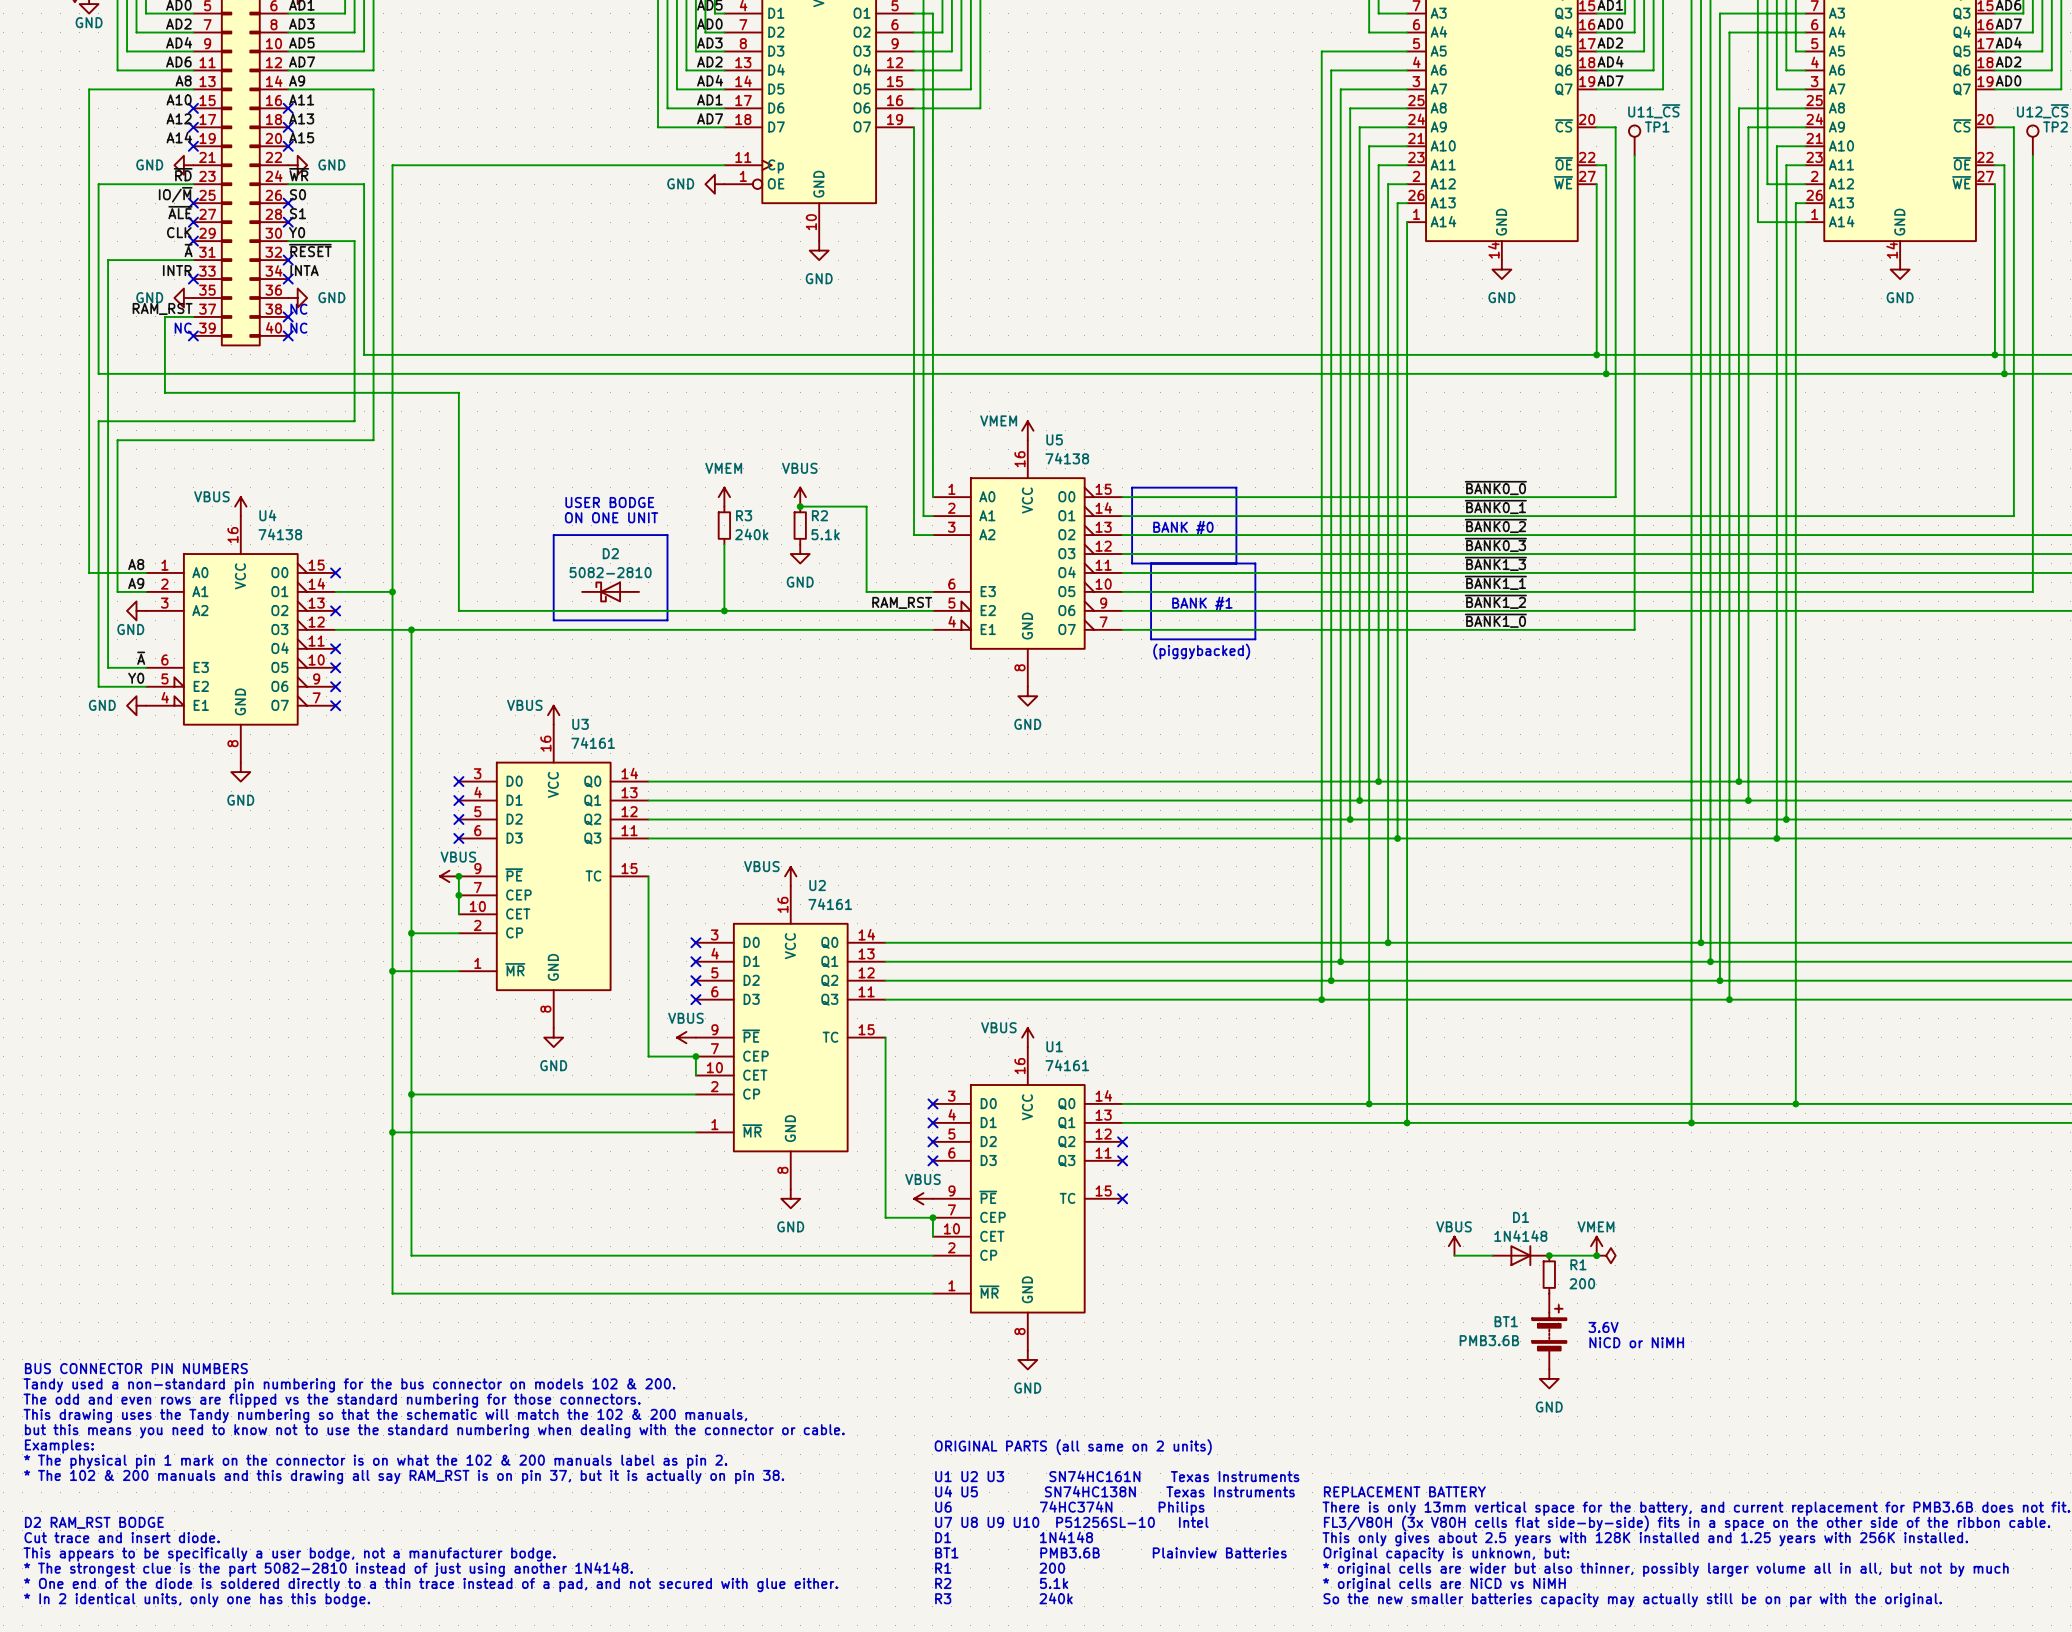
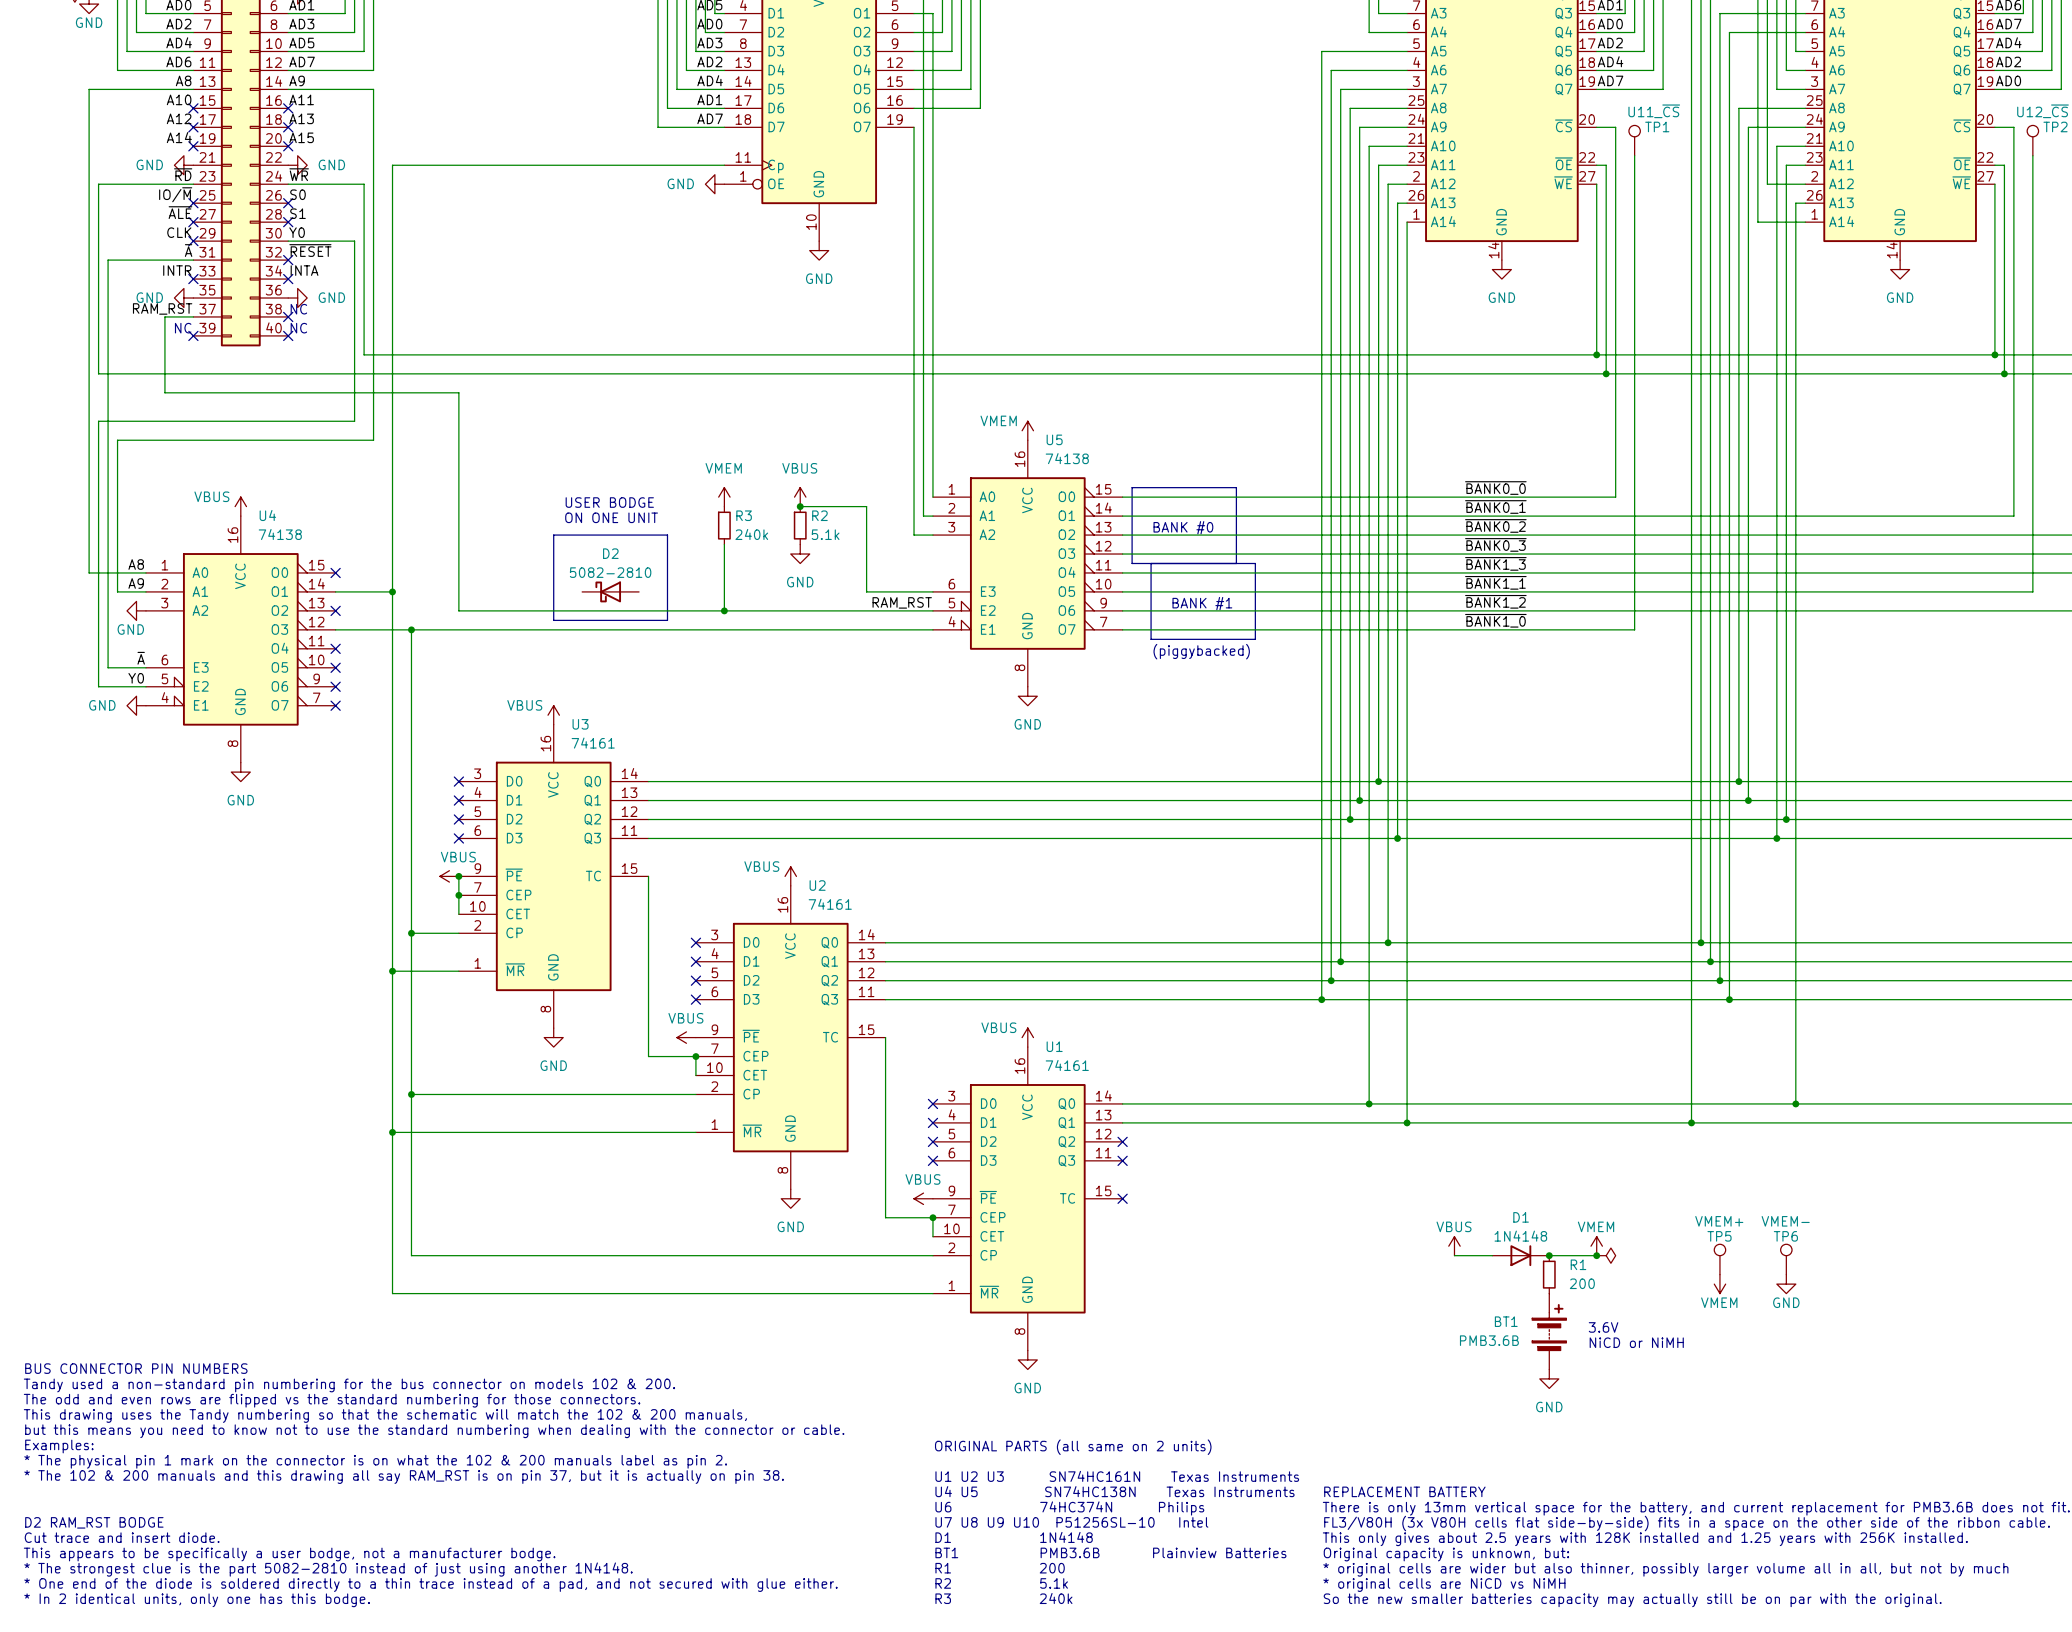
TP5: none -> VMEM+ (1719, 1259)
TP6: none -> VMEM- (1786, 1259)
power symbol: none -> VMEM (1719, 1284)
power symbol: none -> GND (1786, 1284)

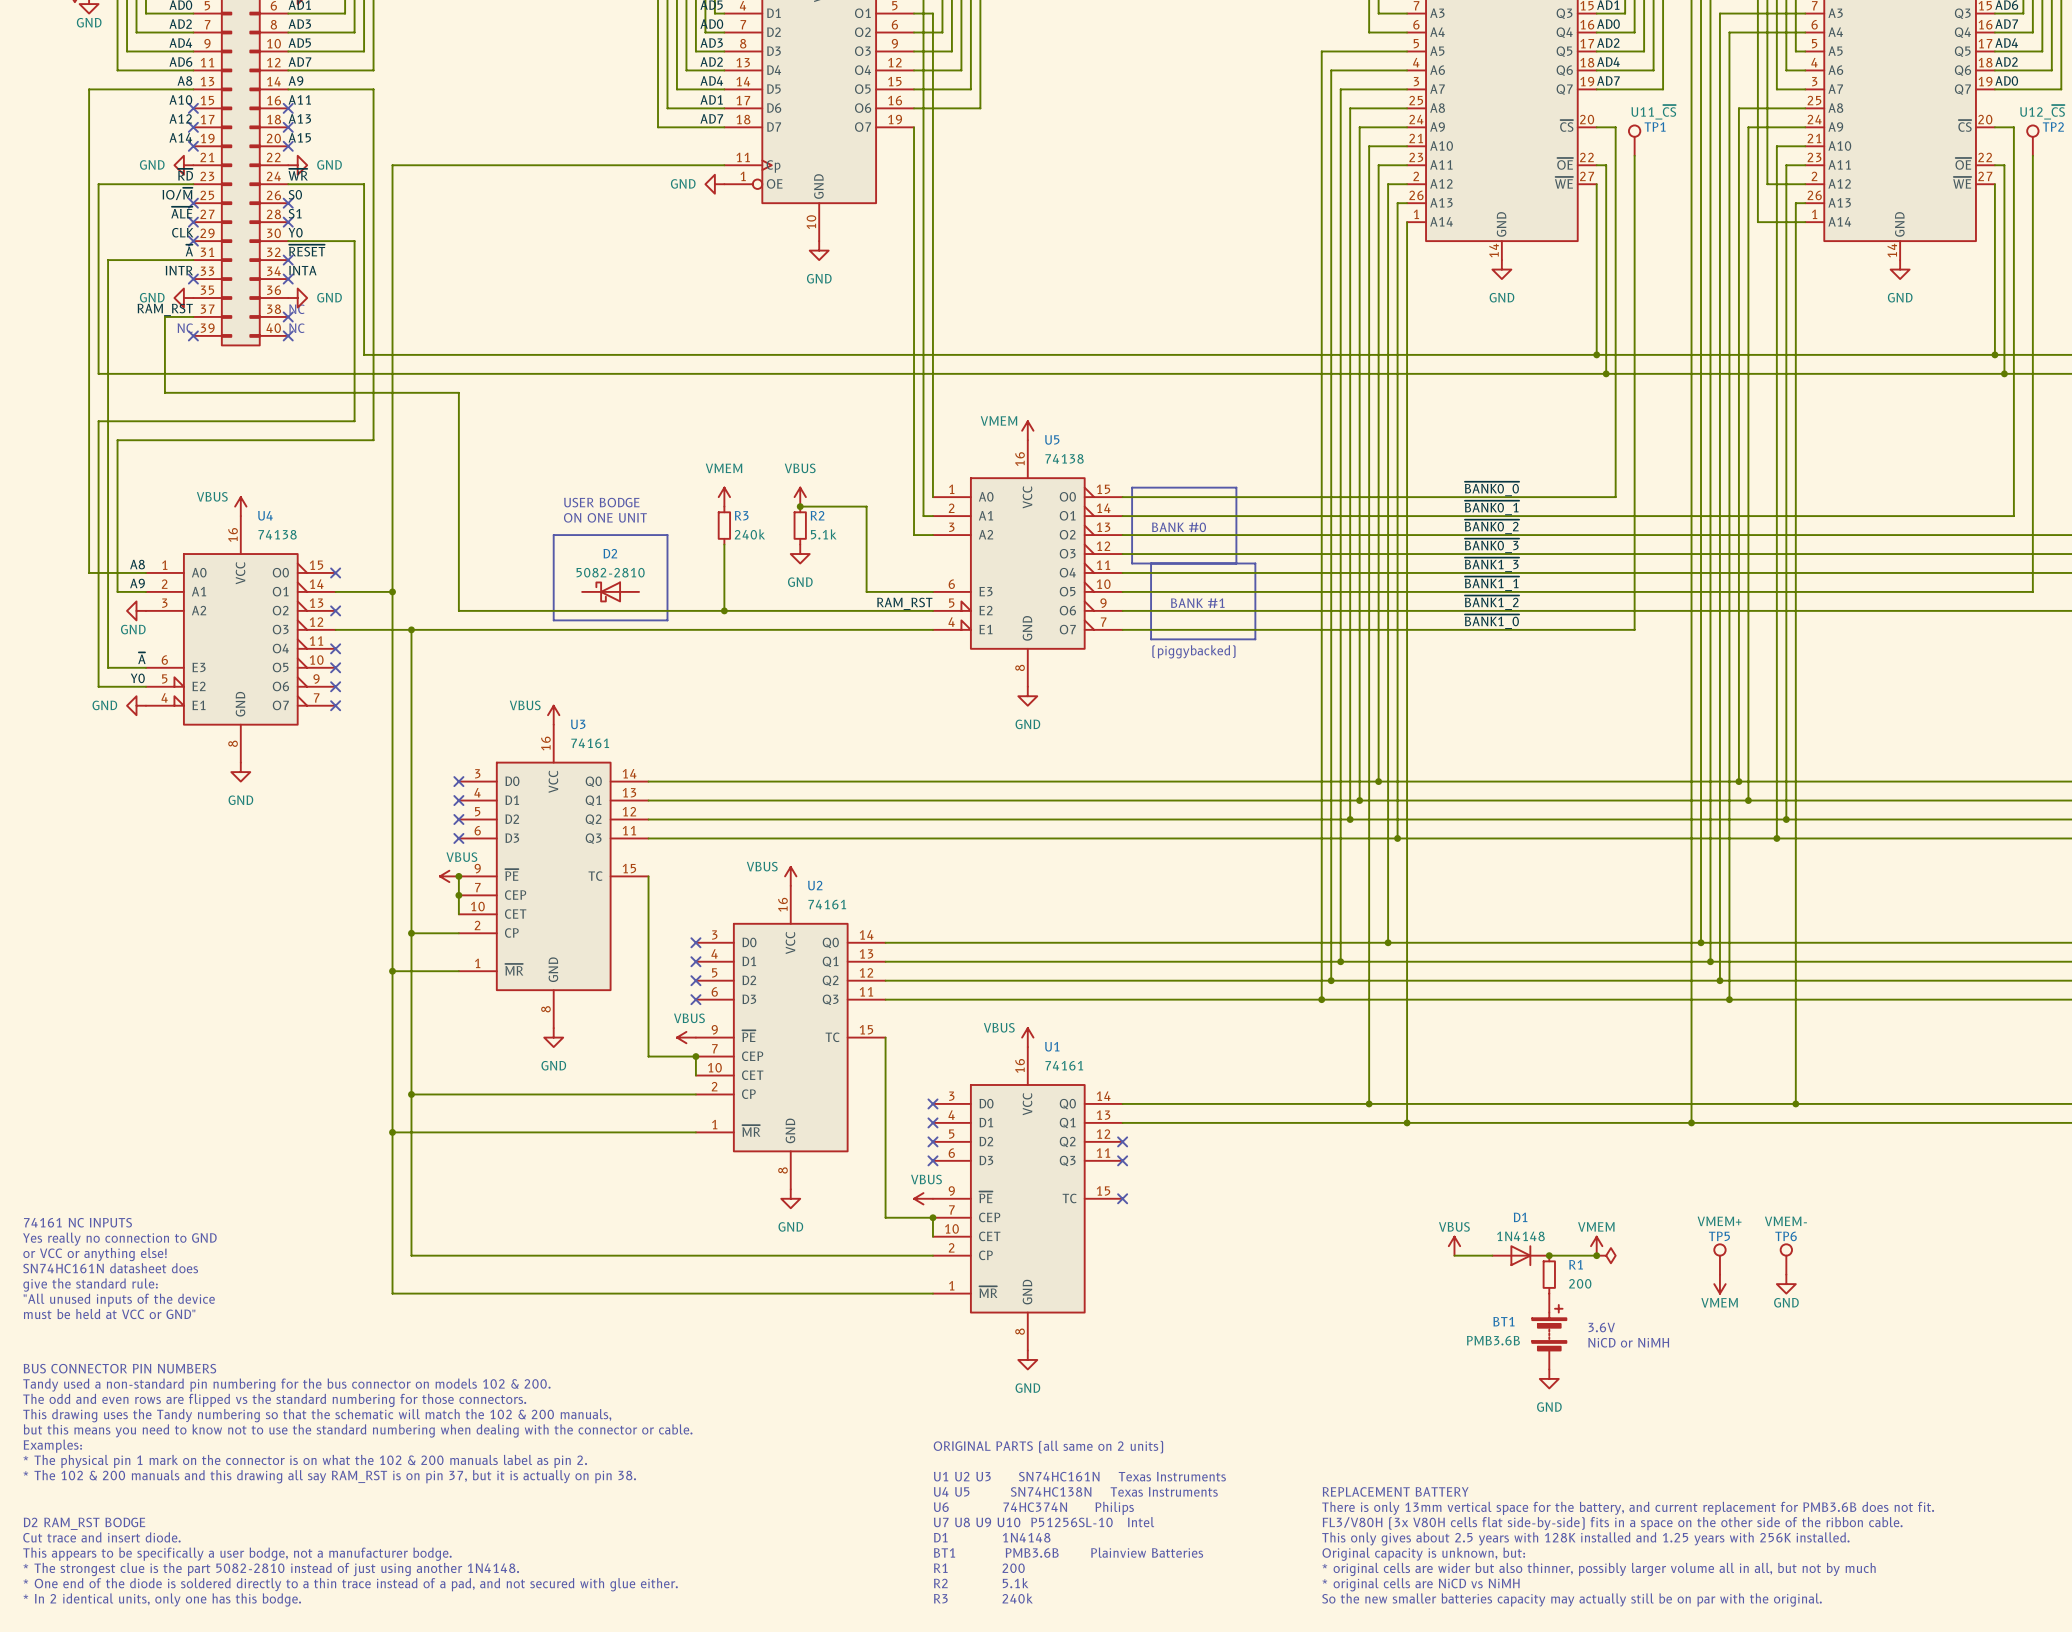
text: none -> 74161 NC INPUTS (77, 1222)
text: none -> Yes really no connection to GND (119, 1239)
text: none -> or VCC or anything else! (95, 1254)
text: none -> SN74HC161N datasheet does (110, 1268)
text: none -> give the standard rule: (90, 1285)
text: none -> "All unused inputs of the device (119, 1300)
text: none -> must be held at VCC or GND" (109, 1314)

